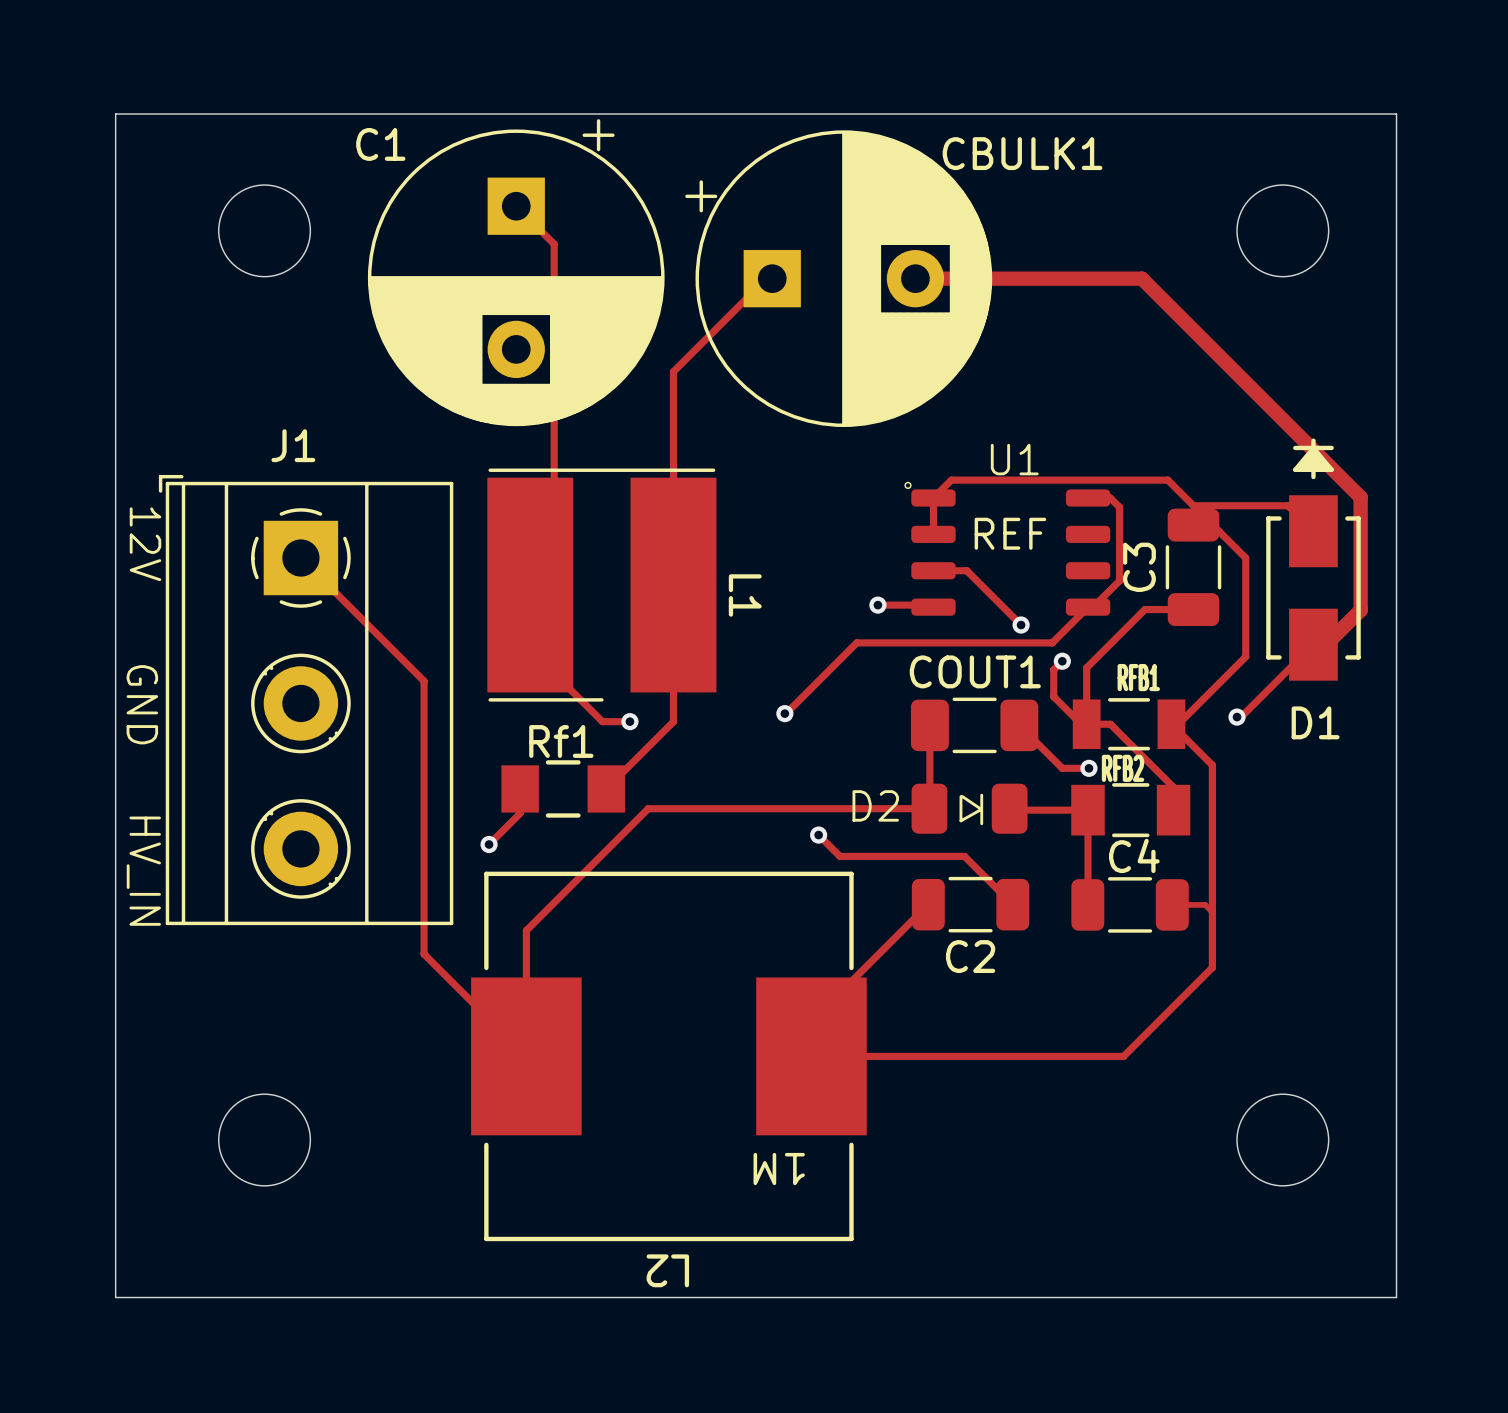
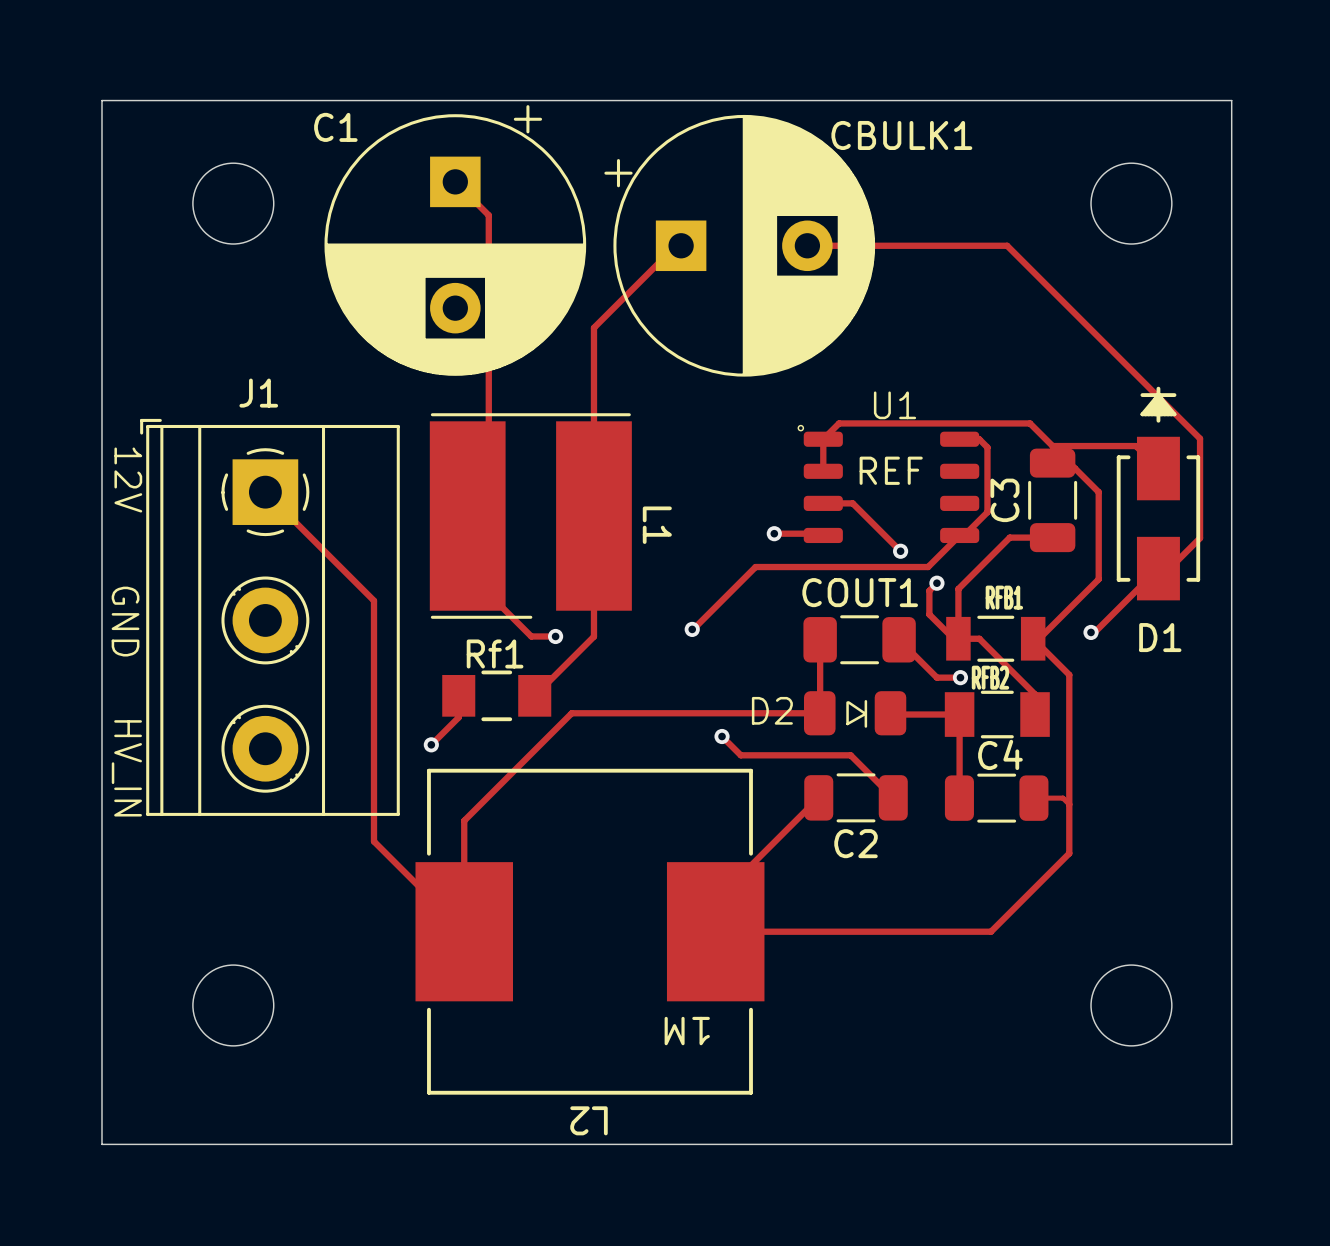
track width: thick (915, 278) (1141, 278) (1360, 497) (1360, 610) (1326, 644) -> thin (807, 245) (1007, 245) (1200, 438) (1200, 538) (1169, 568)

